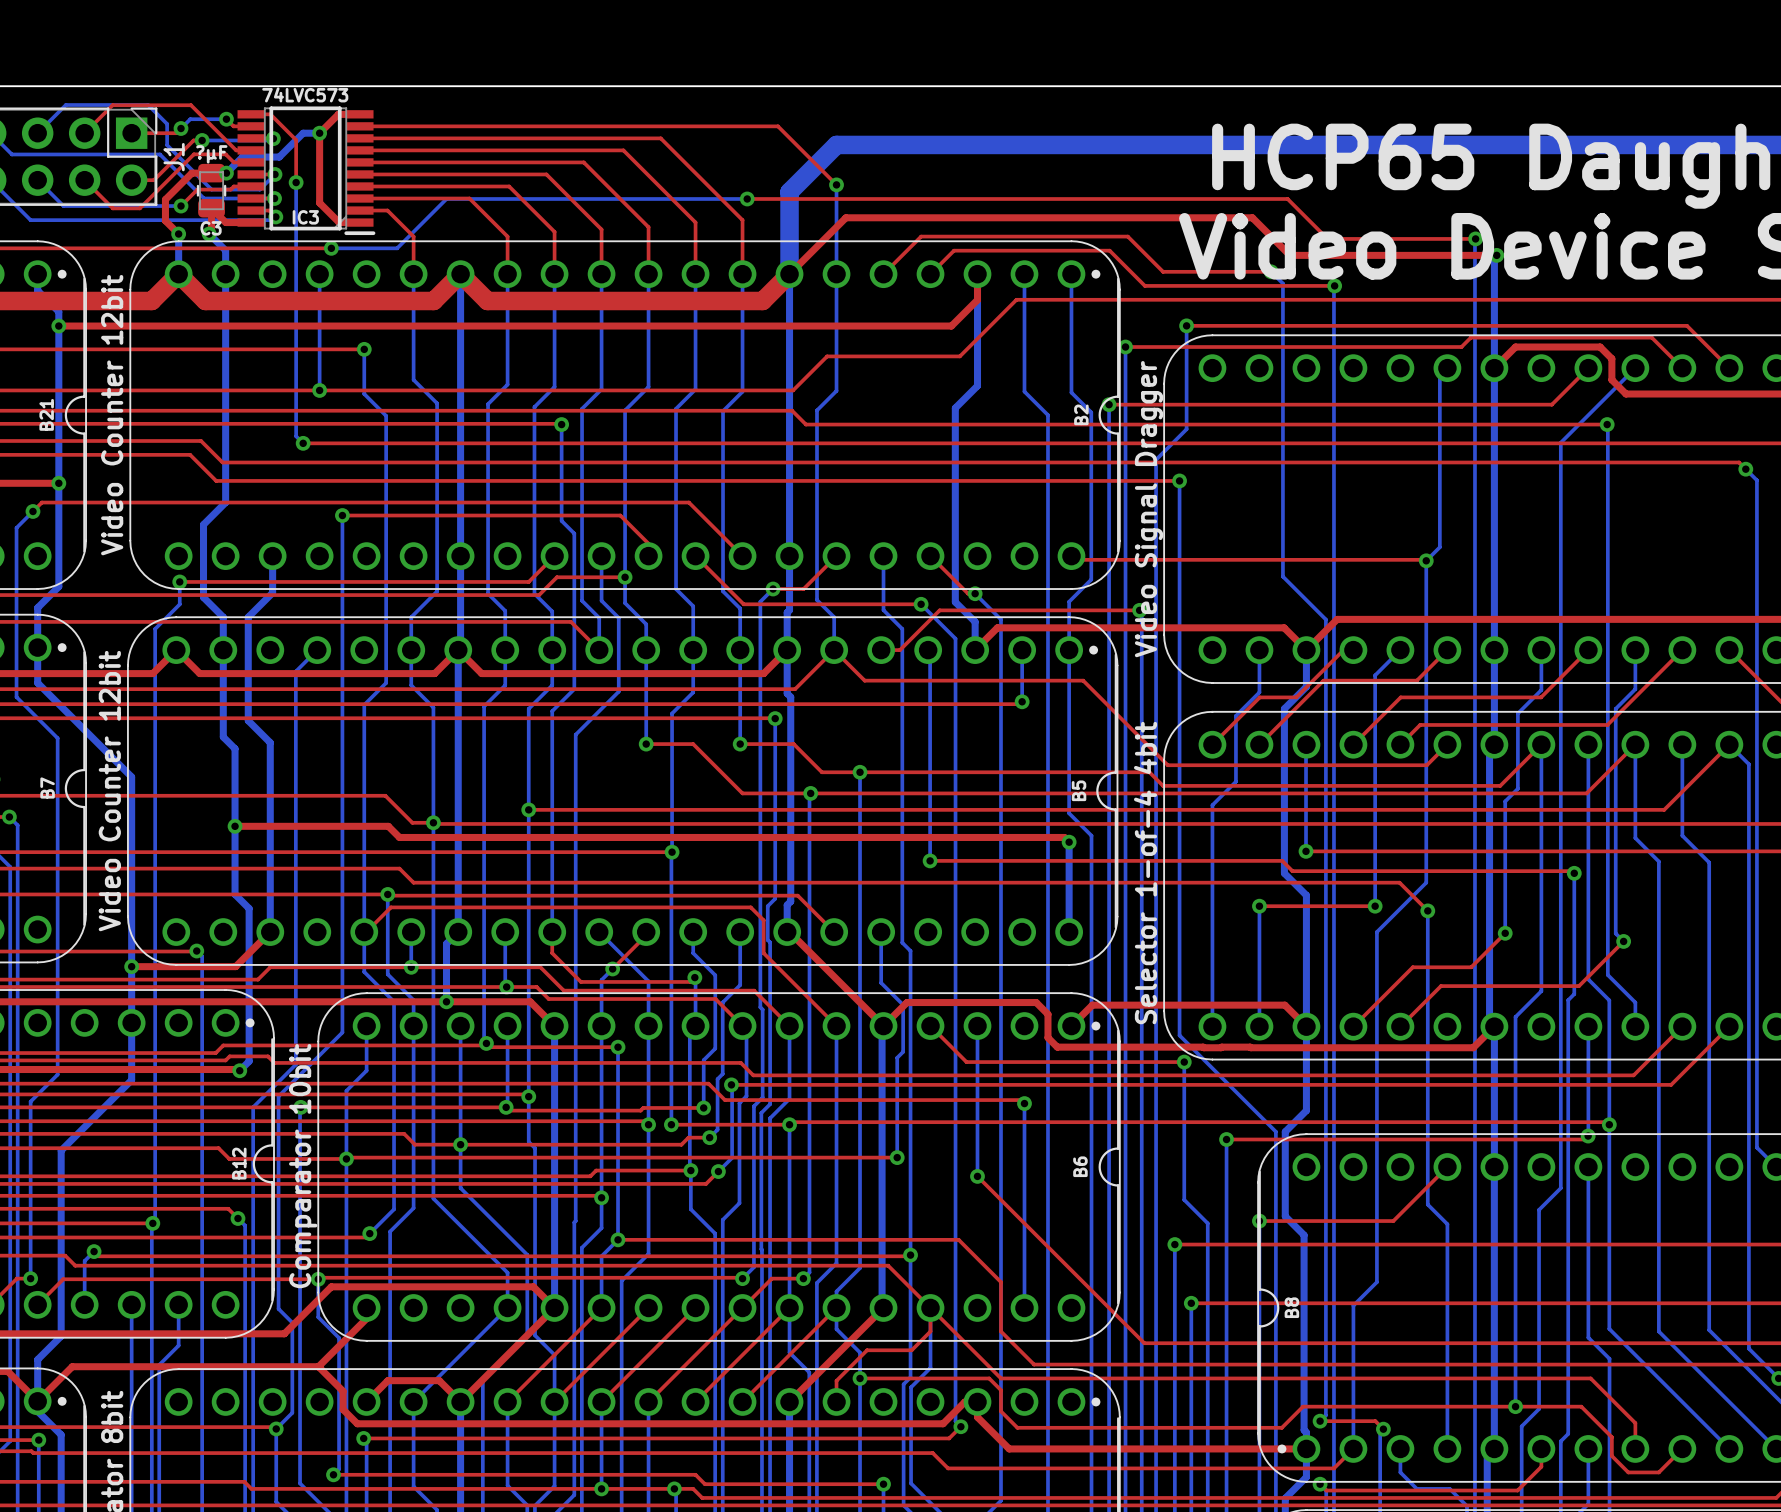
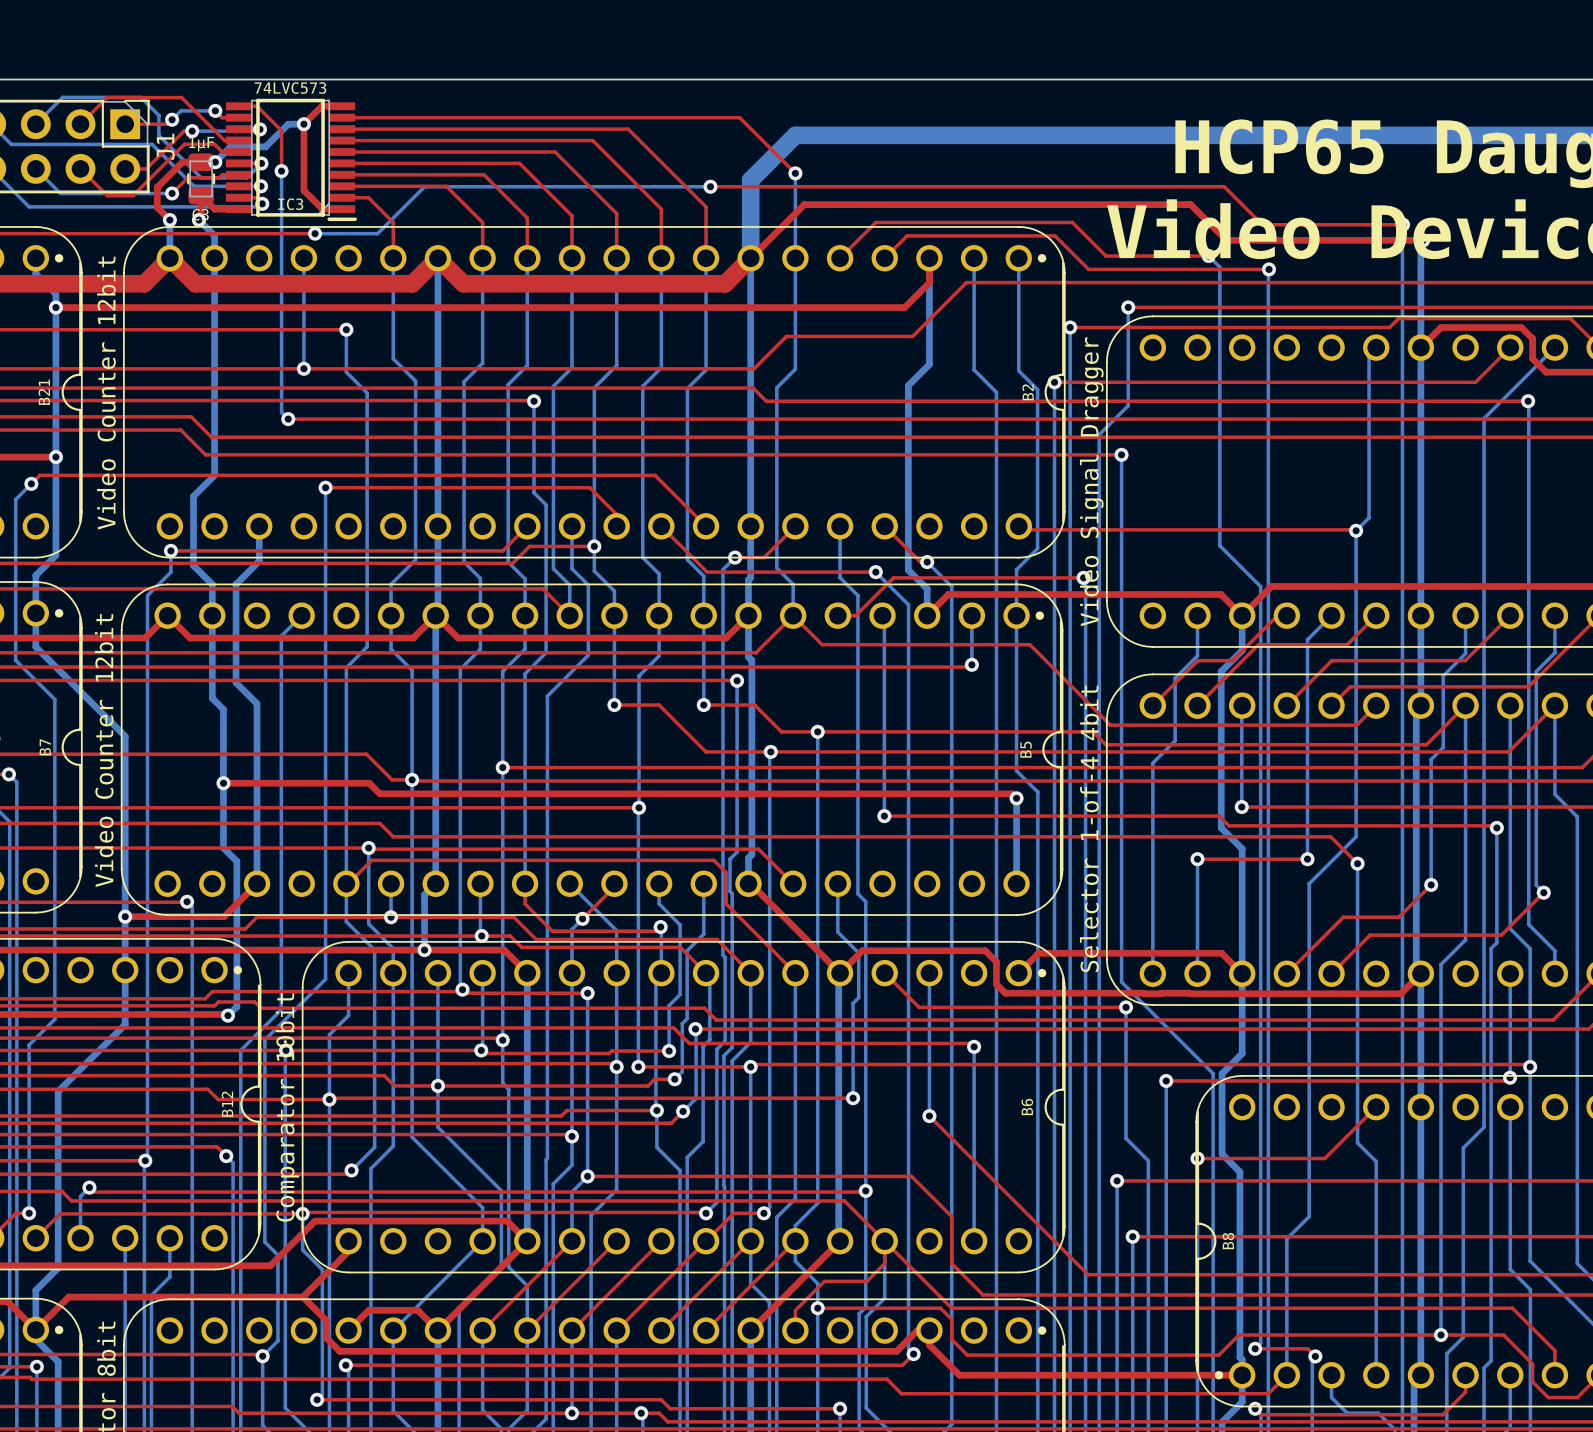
C3 value: ?μF (211, 154) -> 1μF (201, 144)

